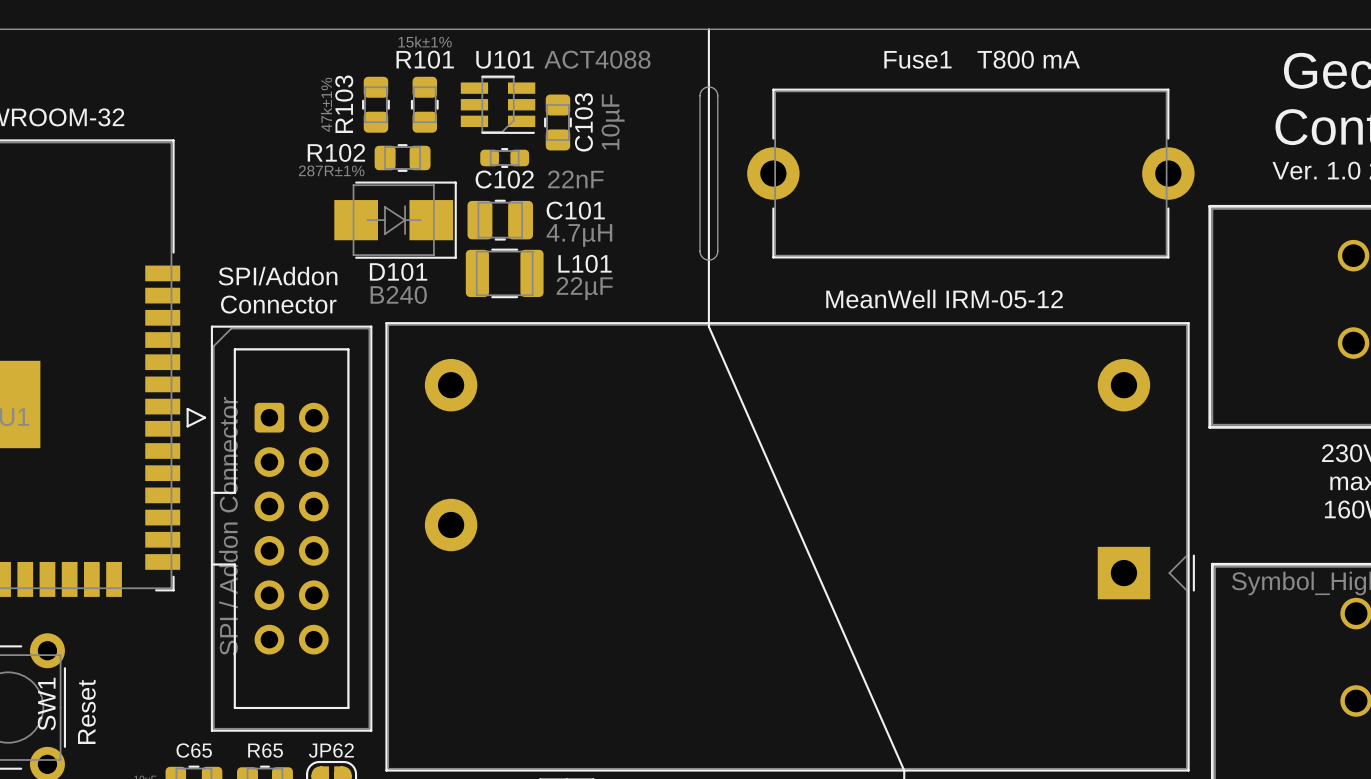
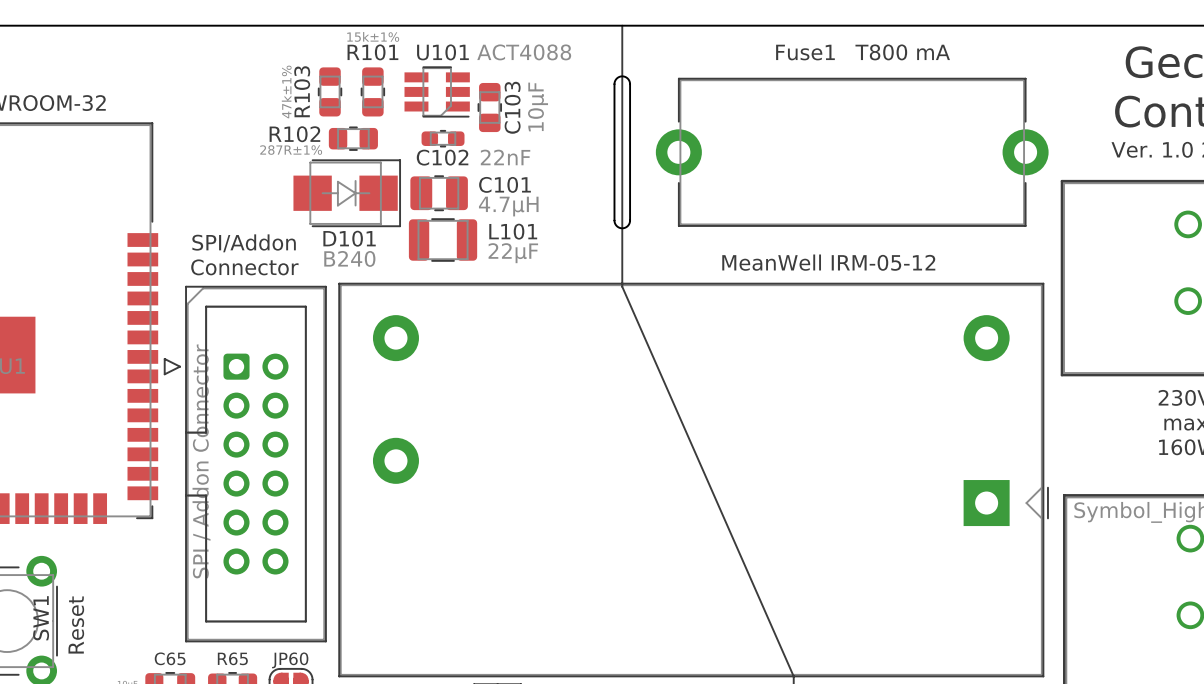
JP62 name: JP62 (331, 750) -> JP60 (290, 660)

